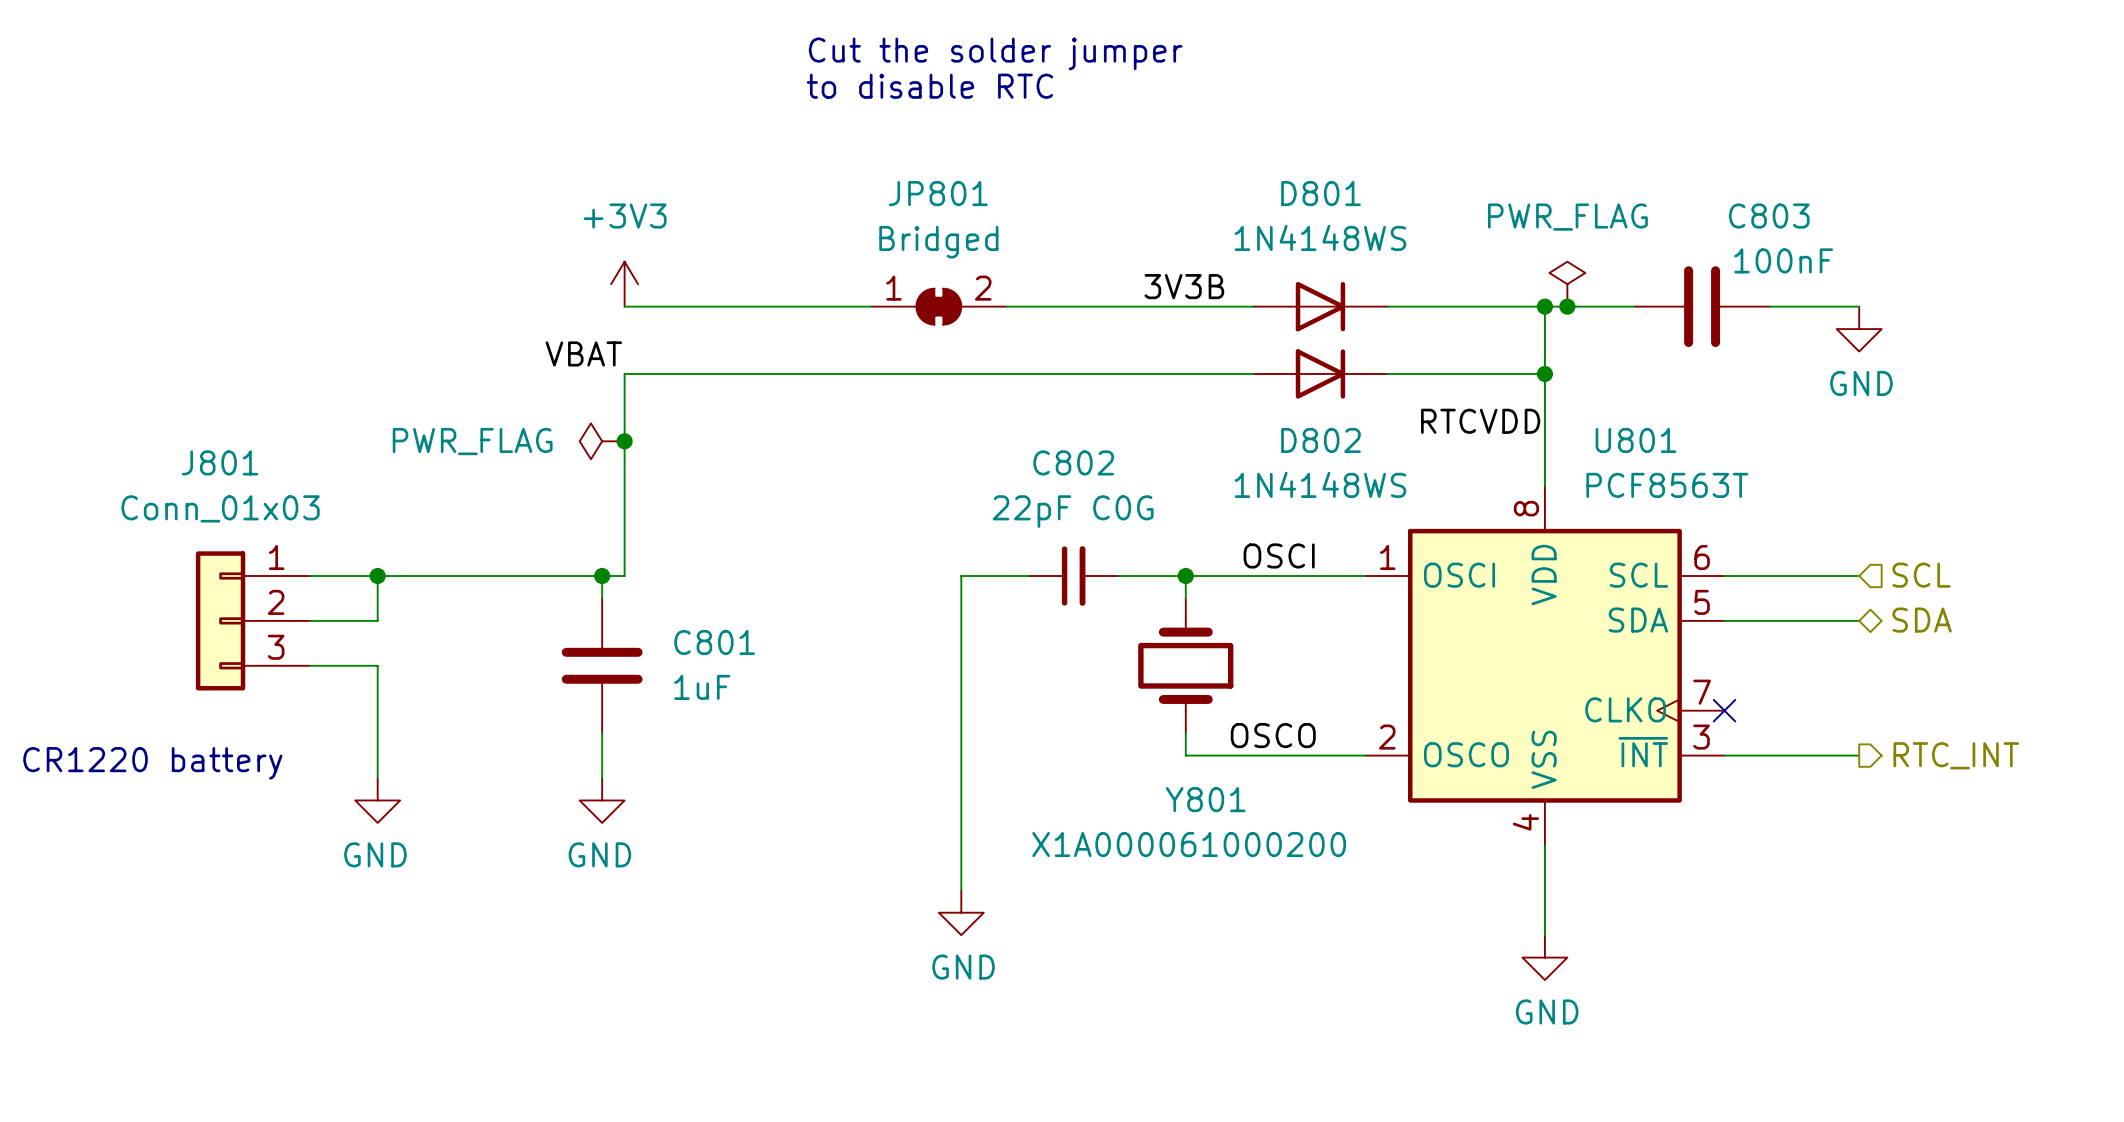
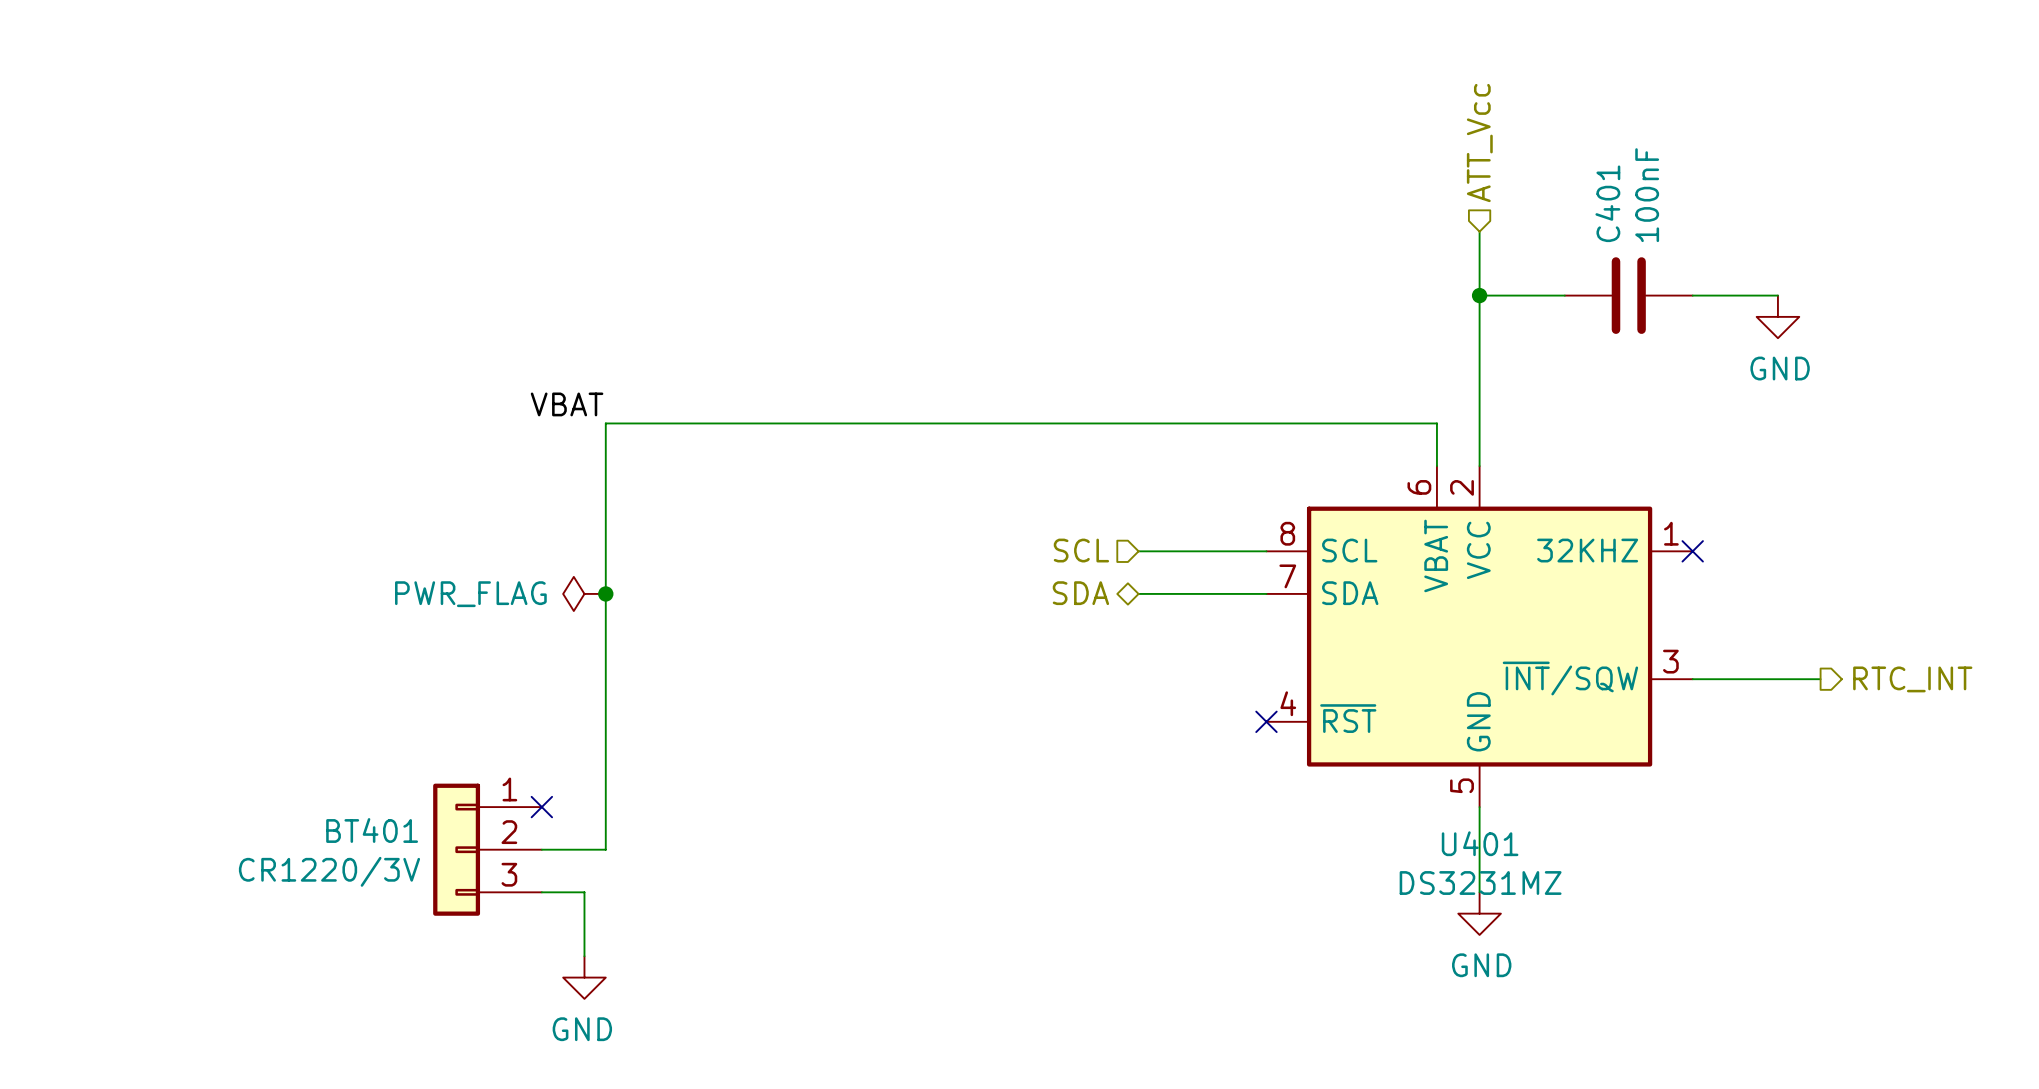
text: Cut the solder jumper (995, 53) -> none
text: to disable RTC (929, 86) -> none
hierarchical label: none -> ATT_Vcc (1479, 143)
C803 name: C803 (1769, 216) -> C401 (1607, 203)
C803 value rotation: 0° (1783, 260) -> 90° counterclockwise (1647, 195)
power symbol: +3V3 (624, 284) -> none
power symbol: PWR_FLAG (1567, 284) -> none
label: 3V3B (1184, 286) -> none
wire: (624, 306) (871, 306) -> none
JP801: Bridged (938, 306) -> none
wire: (1006, 306) (1253, 306) -> none
D801: 1N4148WS (1320, 306) -> none
wire: (1387, 306) (1544, 306) -> (1479, 231) (1479, 295)
junction: (1567, 306) -> none
label position: VBAT (583, 353) -> VBAT (567, 404)
wire: (1253, 373) (624, 373) (624, 441) -> (1436, 466) (1436, 423) (605, 423)
D802: 1N4148WS (1320, 373) -> none
wire: (1387, 373) (1544, 373) -> none
junction: (1544, 373) -> none
label: RTCVDD (1480, 421) -> none
power symbol text position: PWR_FLAG (472, 441) -> PWR_FLAG (470, 594)
power symbol position: PWR_FLAG (602, 441) -> PWR_FLAG (584, 593)
junction: (624, 441) -> none
label: OSCI (1279, 555) -> none
hierarchical label: none -> SCL (1081, 550)
hierarchical label: SCL (1921, 575) -> none
wire: (310, 576) (624, 576) -> (541, 849) (605, 849) (605, 551)
wire: (377, 576) (377, 620) (310, 620) -> none
junction: (377, 576) -> none
wire: (602, 576) (602, 598) -> none
junction position: (602, 576) -> (605, 593)
wire: (1028, 576) (961, 576) (961, 890) -> none
C802: 22pF C0G (1073, 576) -> none
wire: (1118, 576) (1185, 576) (1185, 598) -> none
junction: (1185, 576) -> none
wire: (1724, 576) (1859, 576) -> none
no-connect mark: none -> (1692, 551)
J801: Conn_01x03 (253, 620) -> none
hierarchical label: none -> SDA (1080, 593)
wire: none -> (1138, 593) (1266, 593)
wire: (1724, 620) (1859, 620) -> none
hierarchical label: SDA (1922, 620) -> none
wire: (310, 665) (377, 665) (377, 778) -> none
C801: 1uF (602, 665) -> none
Y801: X1A000061000200 (1185, 665) -> none
U801: PCF8563T (1544, 665) -> none
U401: none -> DS3231MZ (1479, 636)
no-connect mark: (1724, 710) -> none
wire: (602, 733) (602, 778) -> none
wire: (1185, 733) (1185, 755) (1365, 755) -> none
label: OSCO (1273, 735) -> none
no-connect mark: none -> (1266, 721)
wire: (1724, 755) (1859, 755) -> (1692, 679) (1820, 679)
hierarchical label position: RTC_INT (1956, 755) -> RTC_INT (1912, 679)
text: CR1220 battery (152, 763) -> none
power symbol: GND (377, 800) -> none
power symbol: GND (602, 800) -> none
no-connect mark: none -> (541, 807)
BT401: none -> CR1220/3V (487, 849)
power symbol: GND (961, 912) -> none
wire: none -> (541, 892) (584, 892) (584, 956)
power symbol: none -> GND (584, 977)

